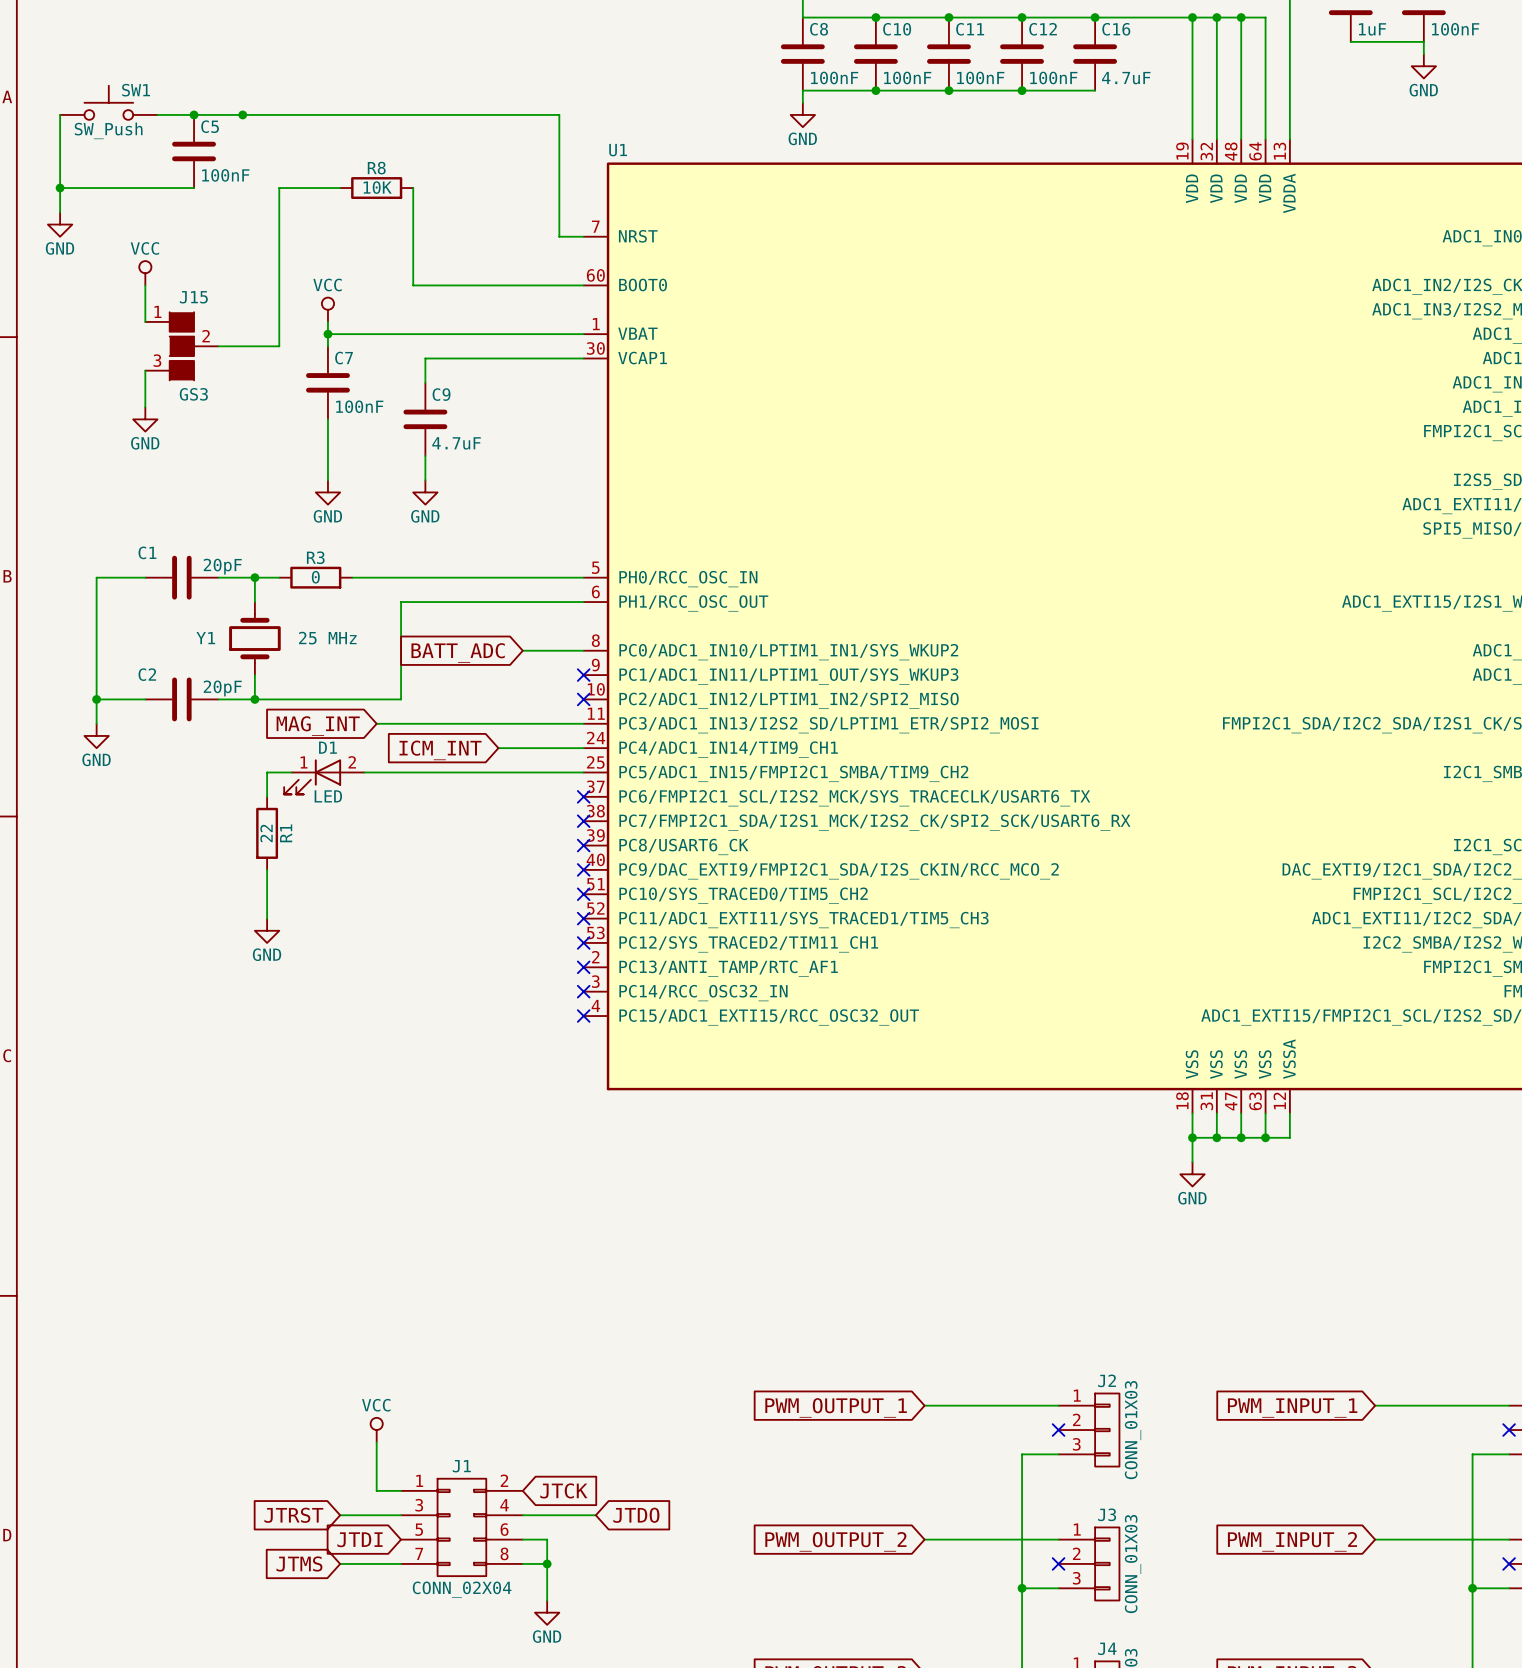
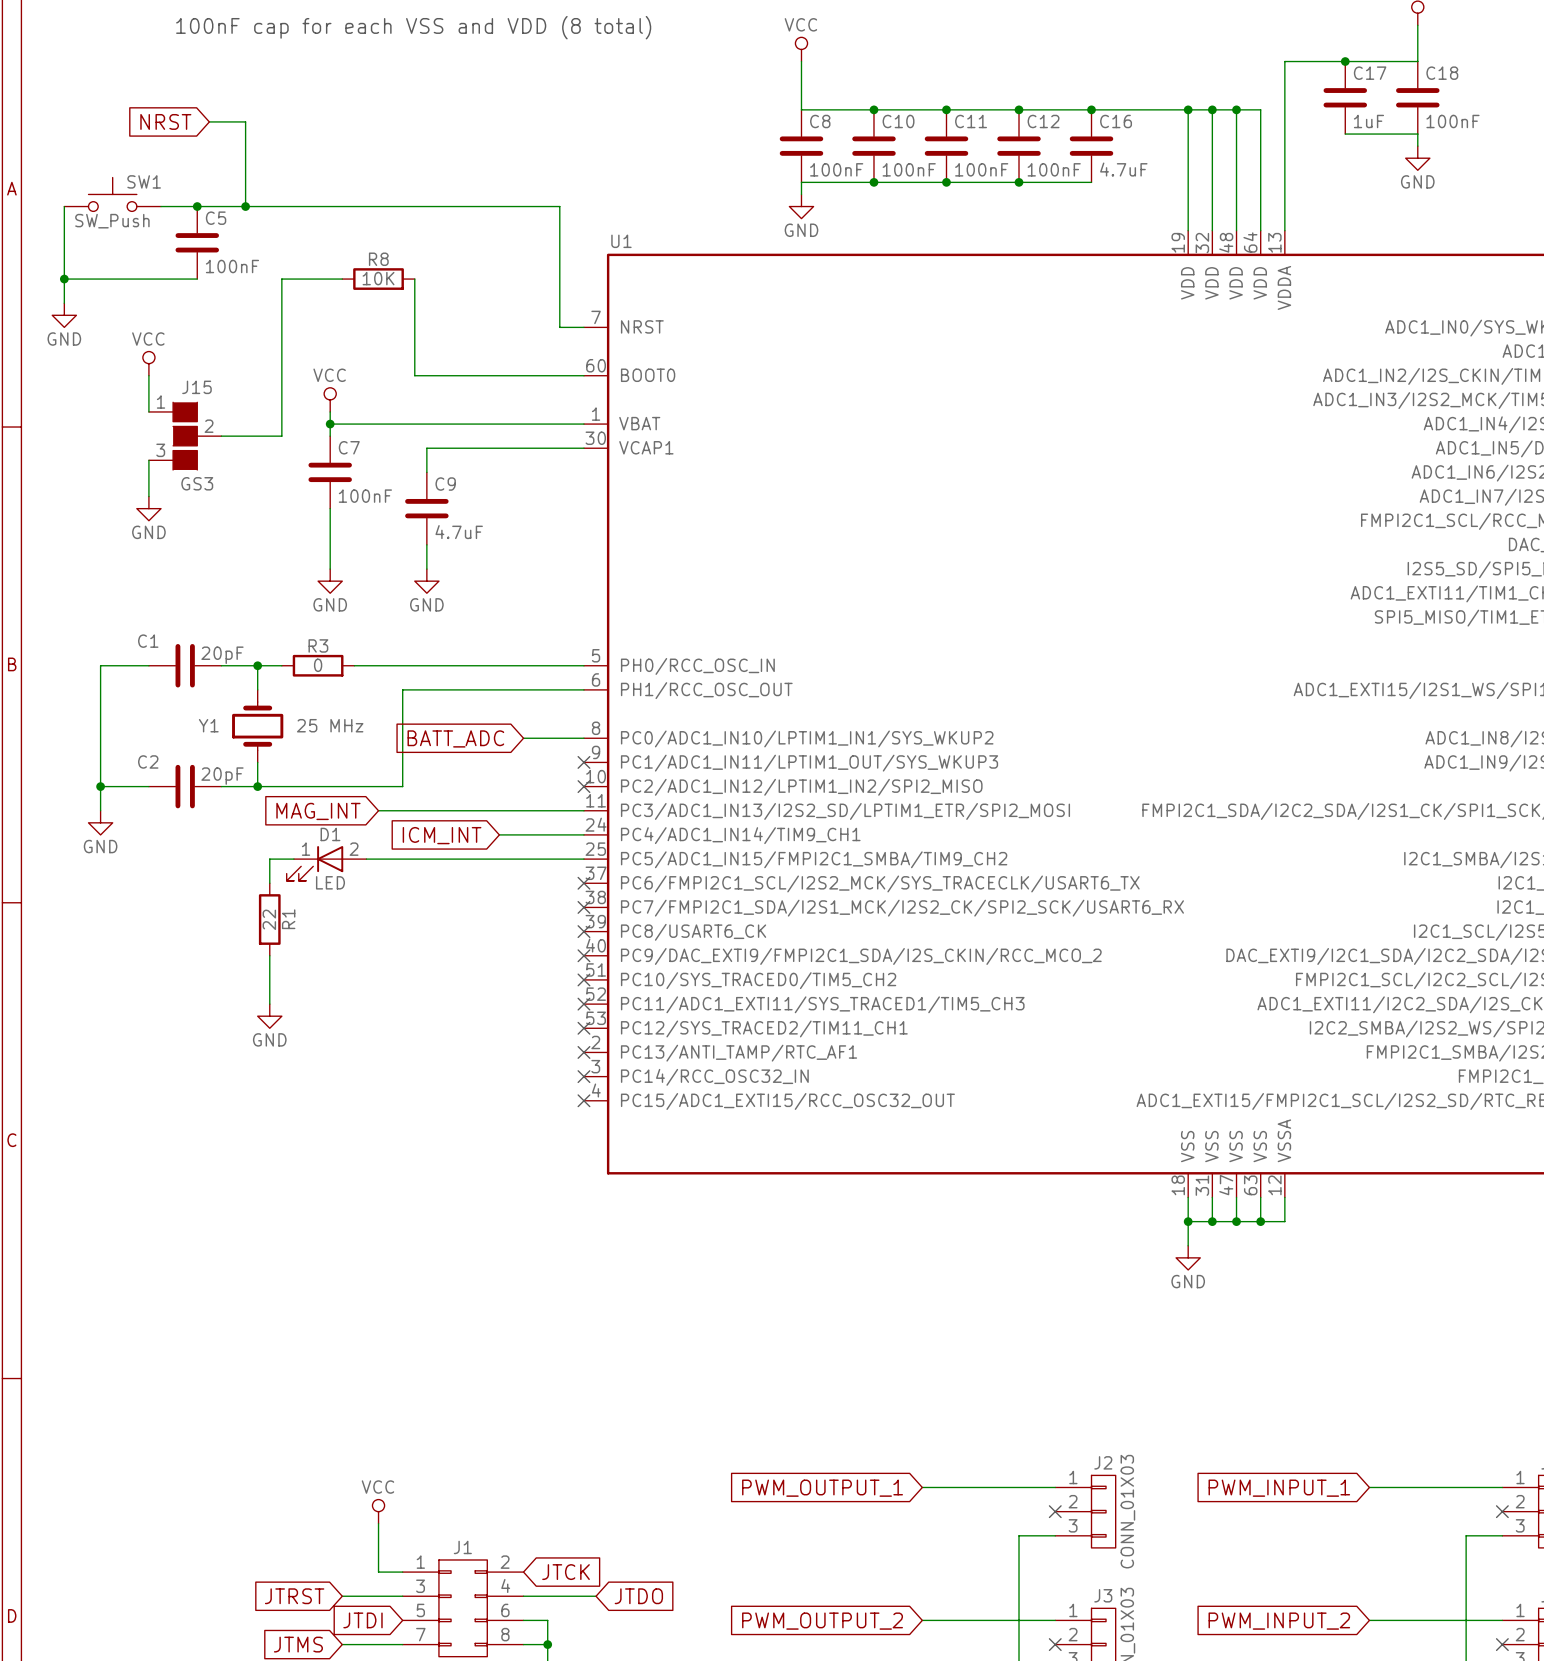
global label: none -> NRST (165, 121)
wire: none -> (209, 121) (245, 121) (245, 206)

